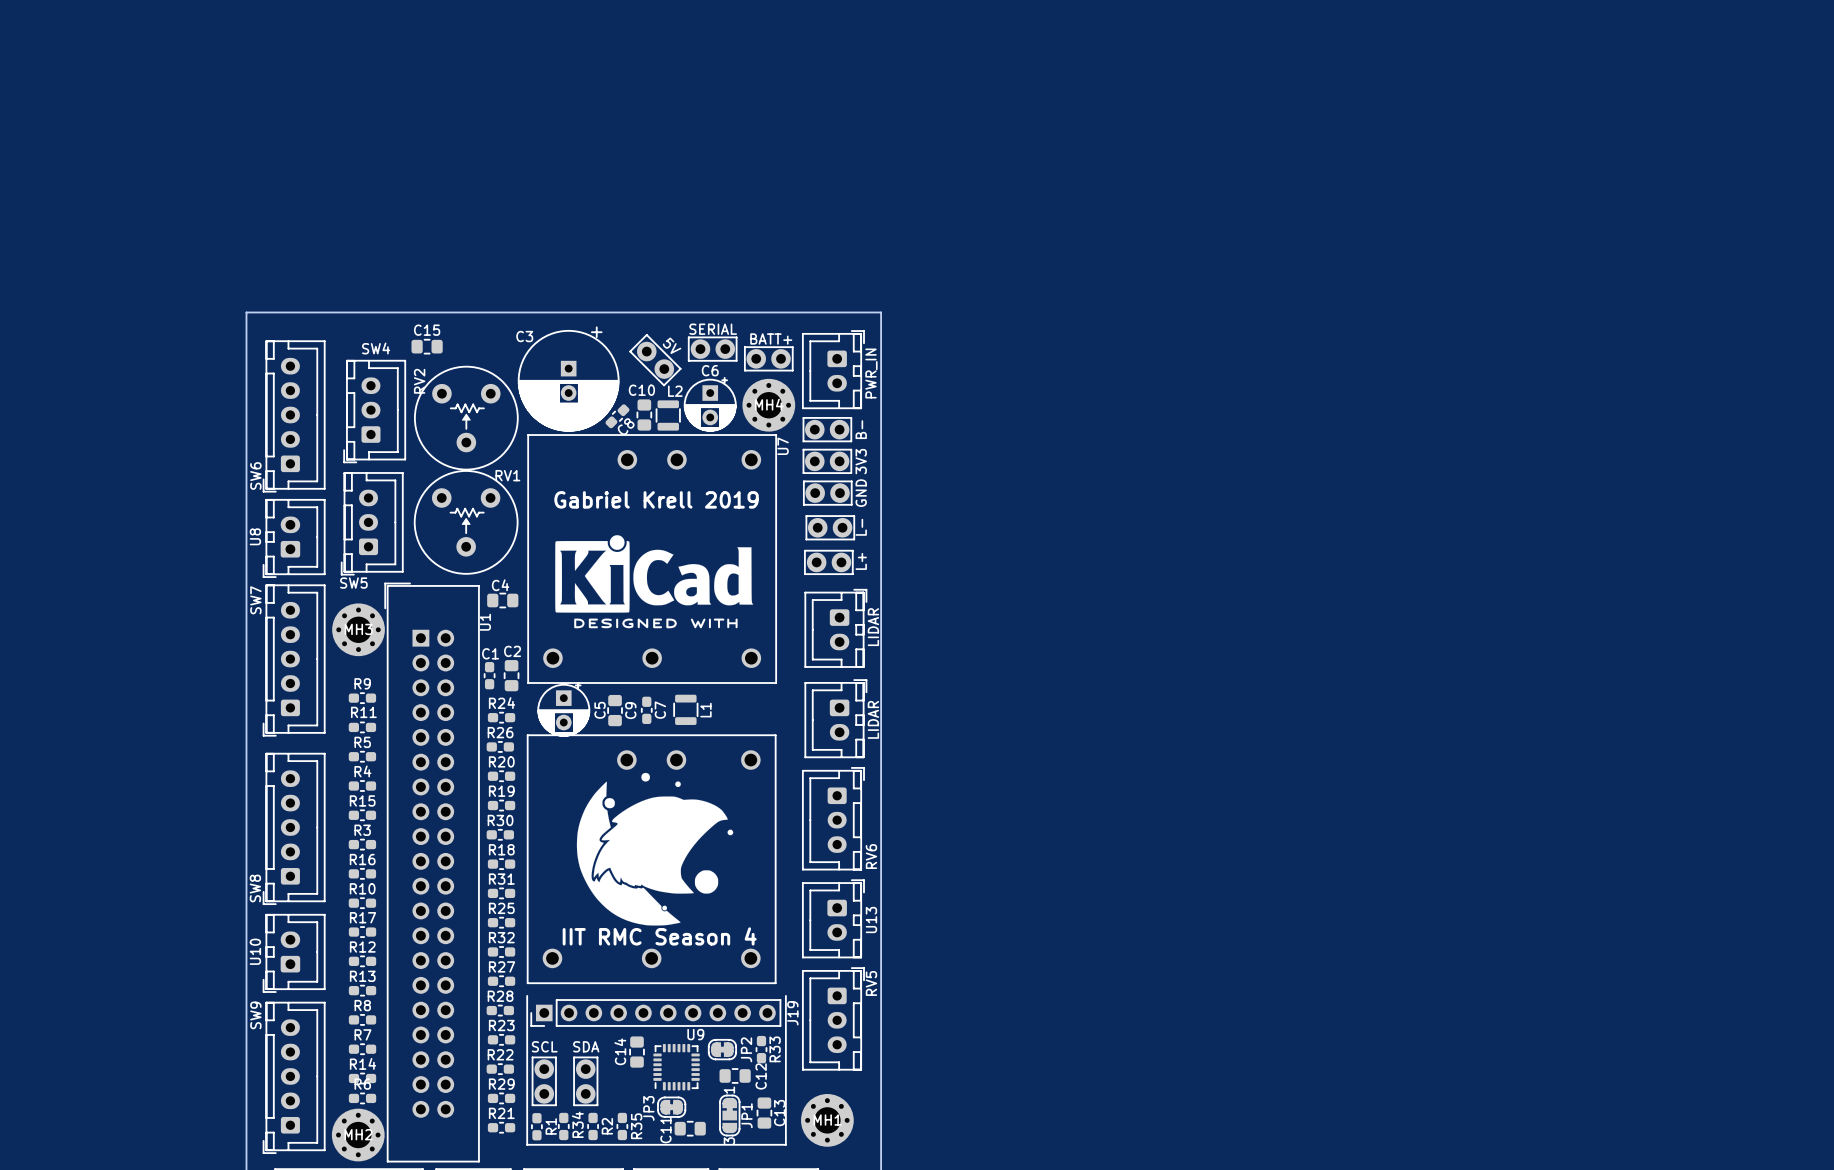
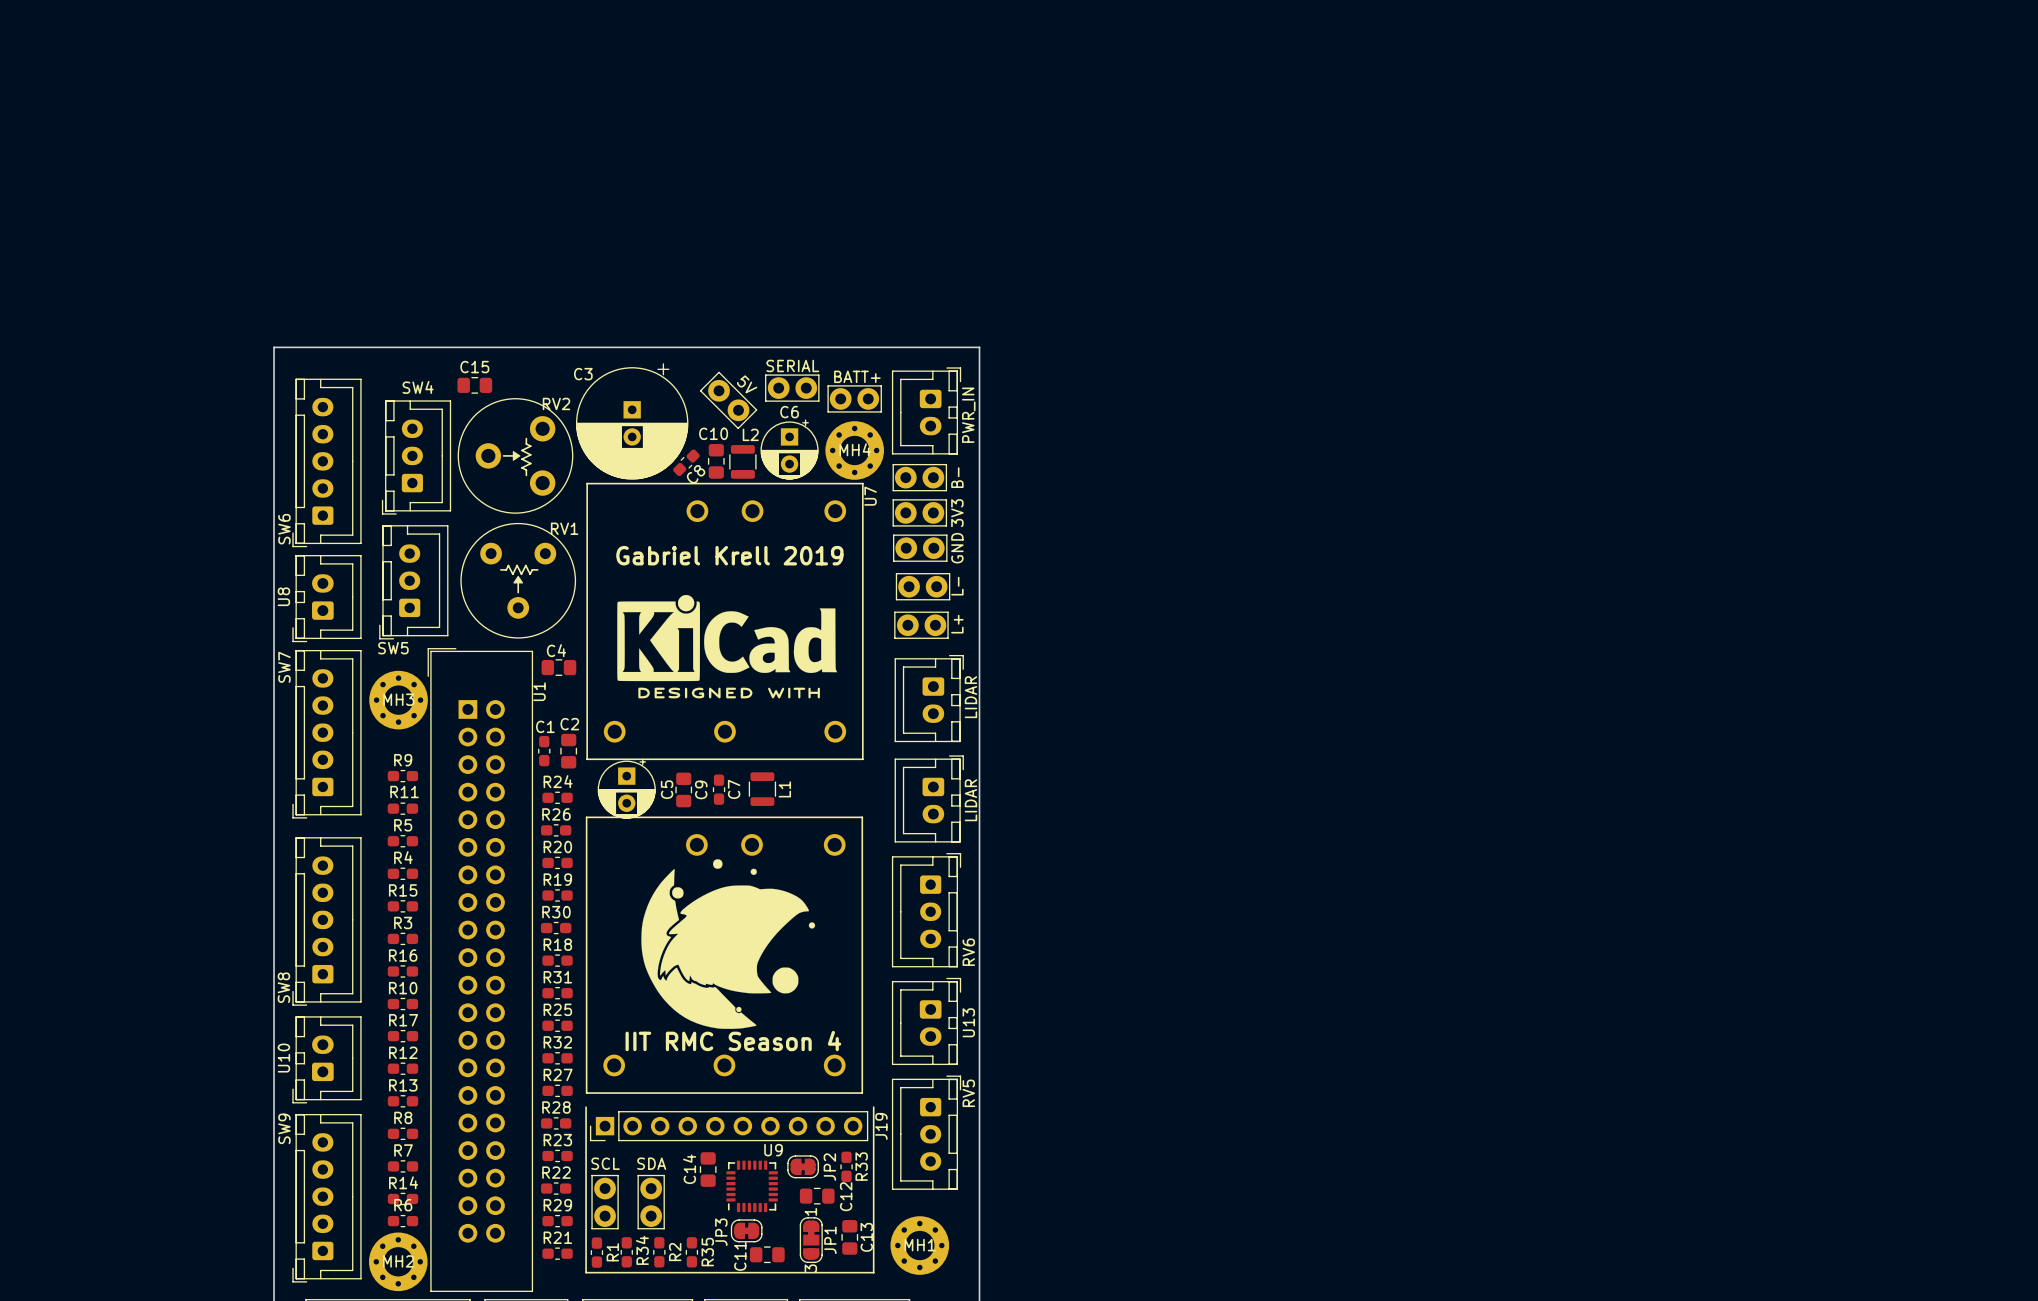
RV2 footprint: [414, 366, 519, 471] -> [457, 398, 574, 514]
RV2 name position: RV2 (419, 381) -> RV2 (556, 403)

